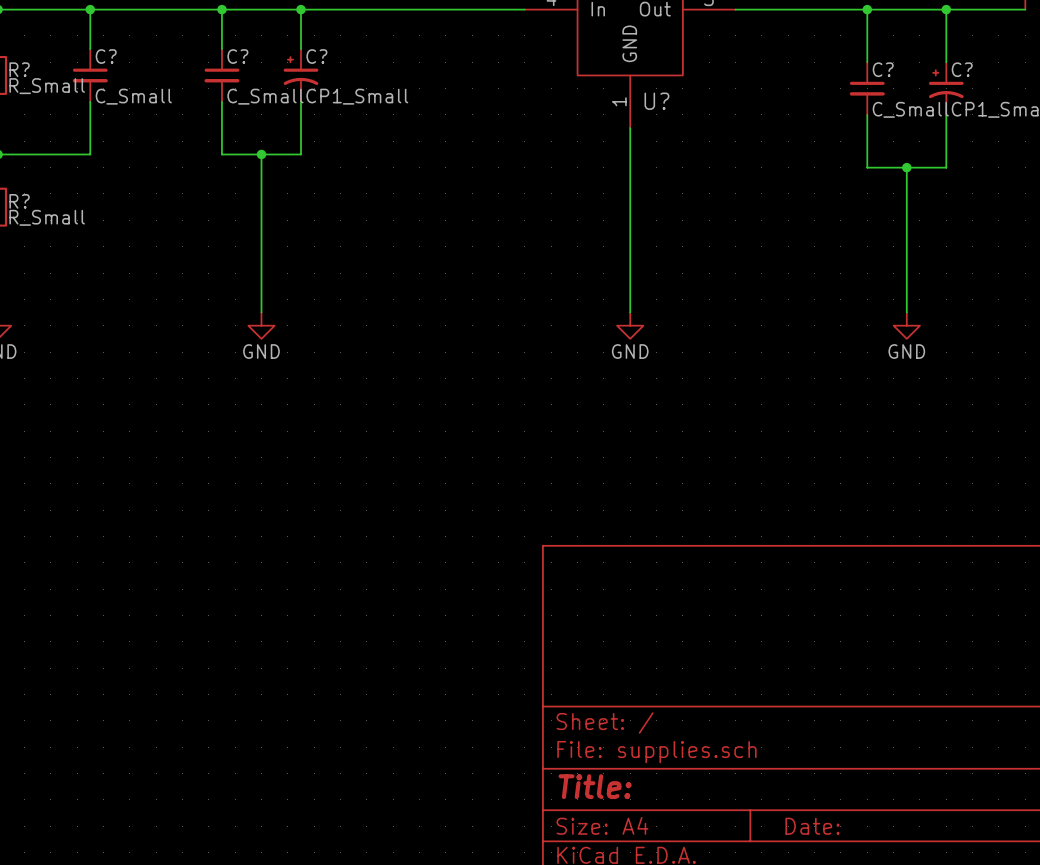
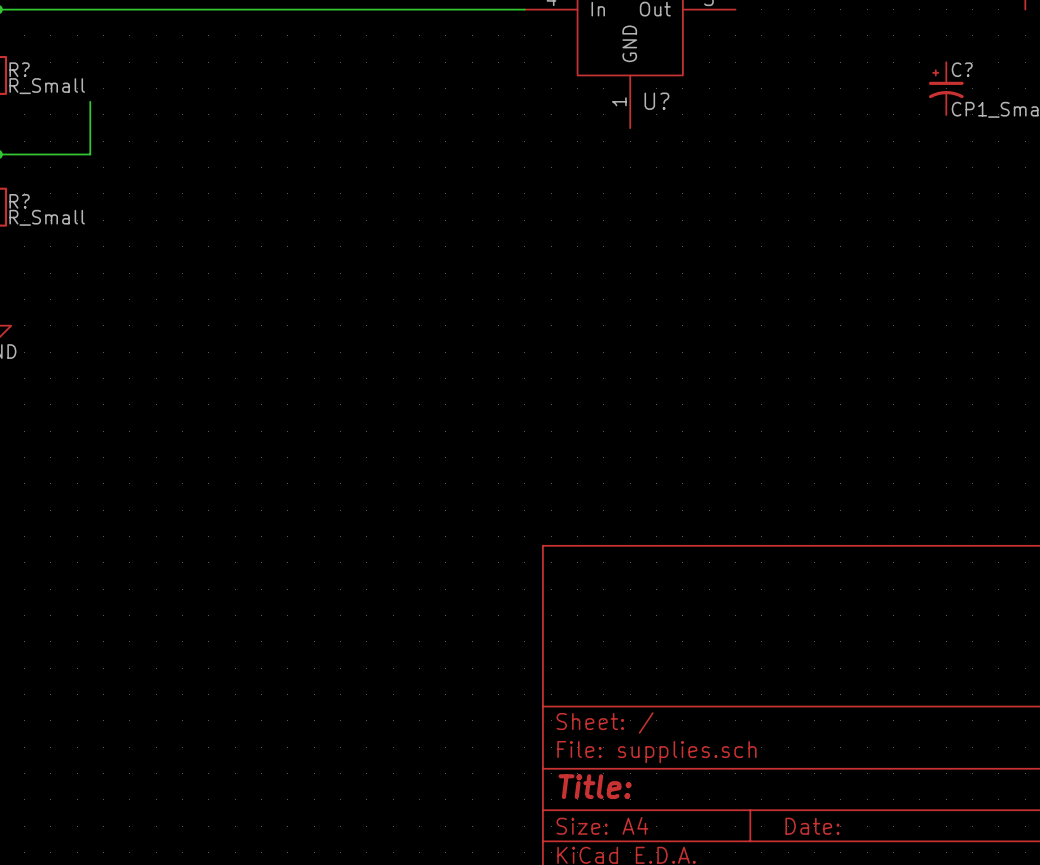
wire: (90, 9) (90, 49) -> none
junction: (90, 9) -> none
wire: (221, 9) (221, 49) -> none
junction: (221, 9) -> none
wire: (300, 9) (300, 49) -> none
junction: (300, 9) -> none
wire: (735, 9) (1025, 9) -> none
wire: (867, 9) (867, 62) -> none
junction: (867, 9) -> none
wire: (946, 9) (946, 62) -> none
junction: (946, 9) -> none
C?: C_Small (90, 75) -> none
C?: C_Small (221, 75) -> none
C?: CP1_Small (300, 75) -> none
C?: C_Small (867, 88) -> none
wire: (221, 101) (221, 154) (300, 154) (300, 101) -> none
wire: (867, 114) (867, 167) (946, 167) (946, 114) -> none
wire: (630, 128) (630, 312) -> none
wire: (261, 154) (261, 312) -> none
junction: (261, 154) -> none
wire: (906, 167) (906, 312) -> none
junction: (906, 167) -> none
power symbol: GND (261, 325) -> none
power symbol: GND (630, 325) -> none
power symbol: GND (906, 325) -> none

